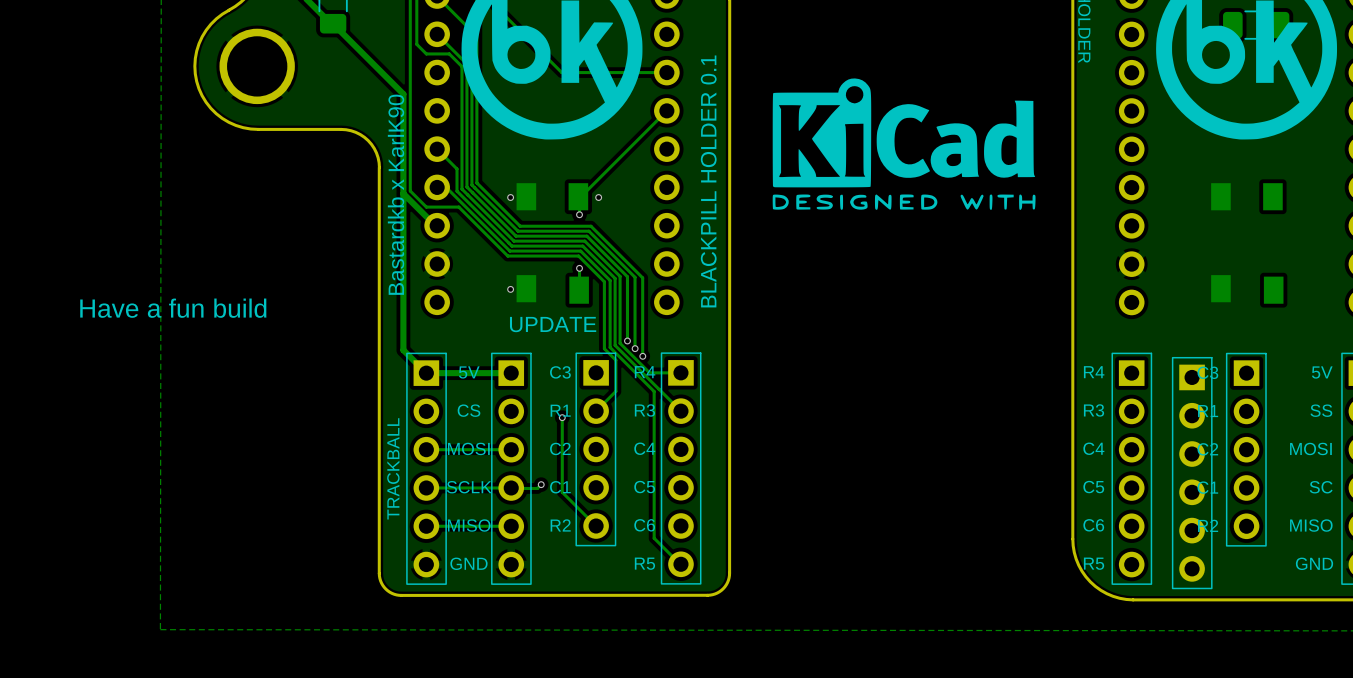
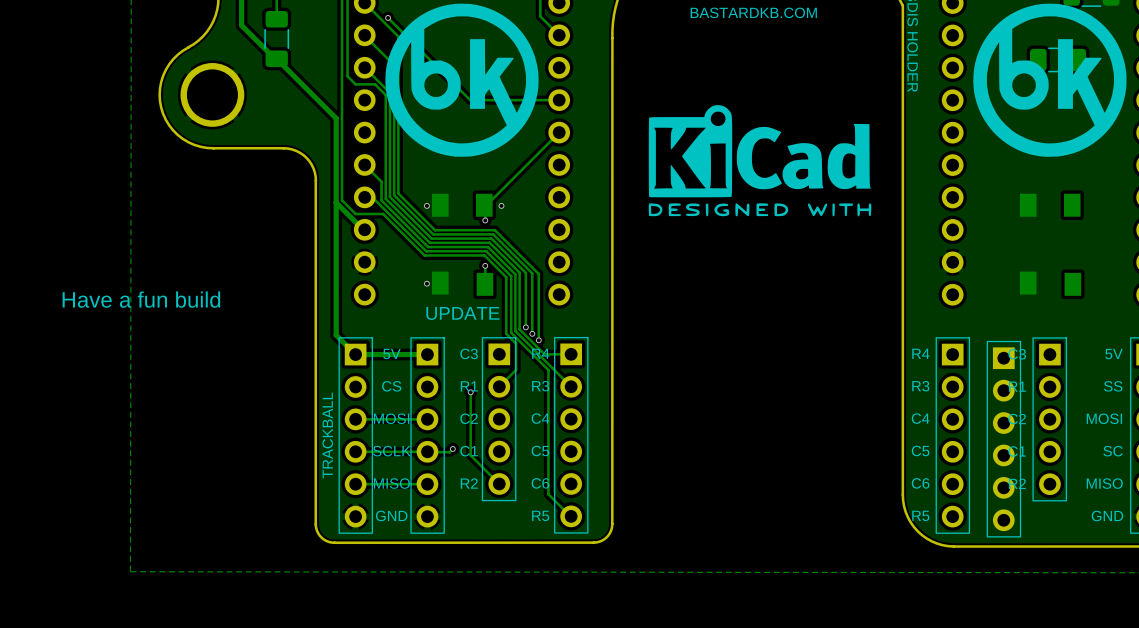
text: BLACKPILL HOLDER 0.1 (708, 181) -> none
text: Bastardkb x KarlK90 (396, 194) -> none

